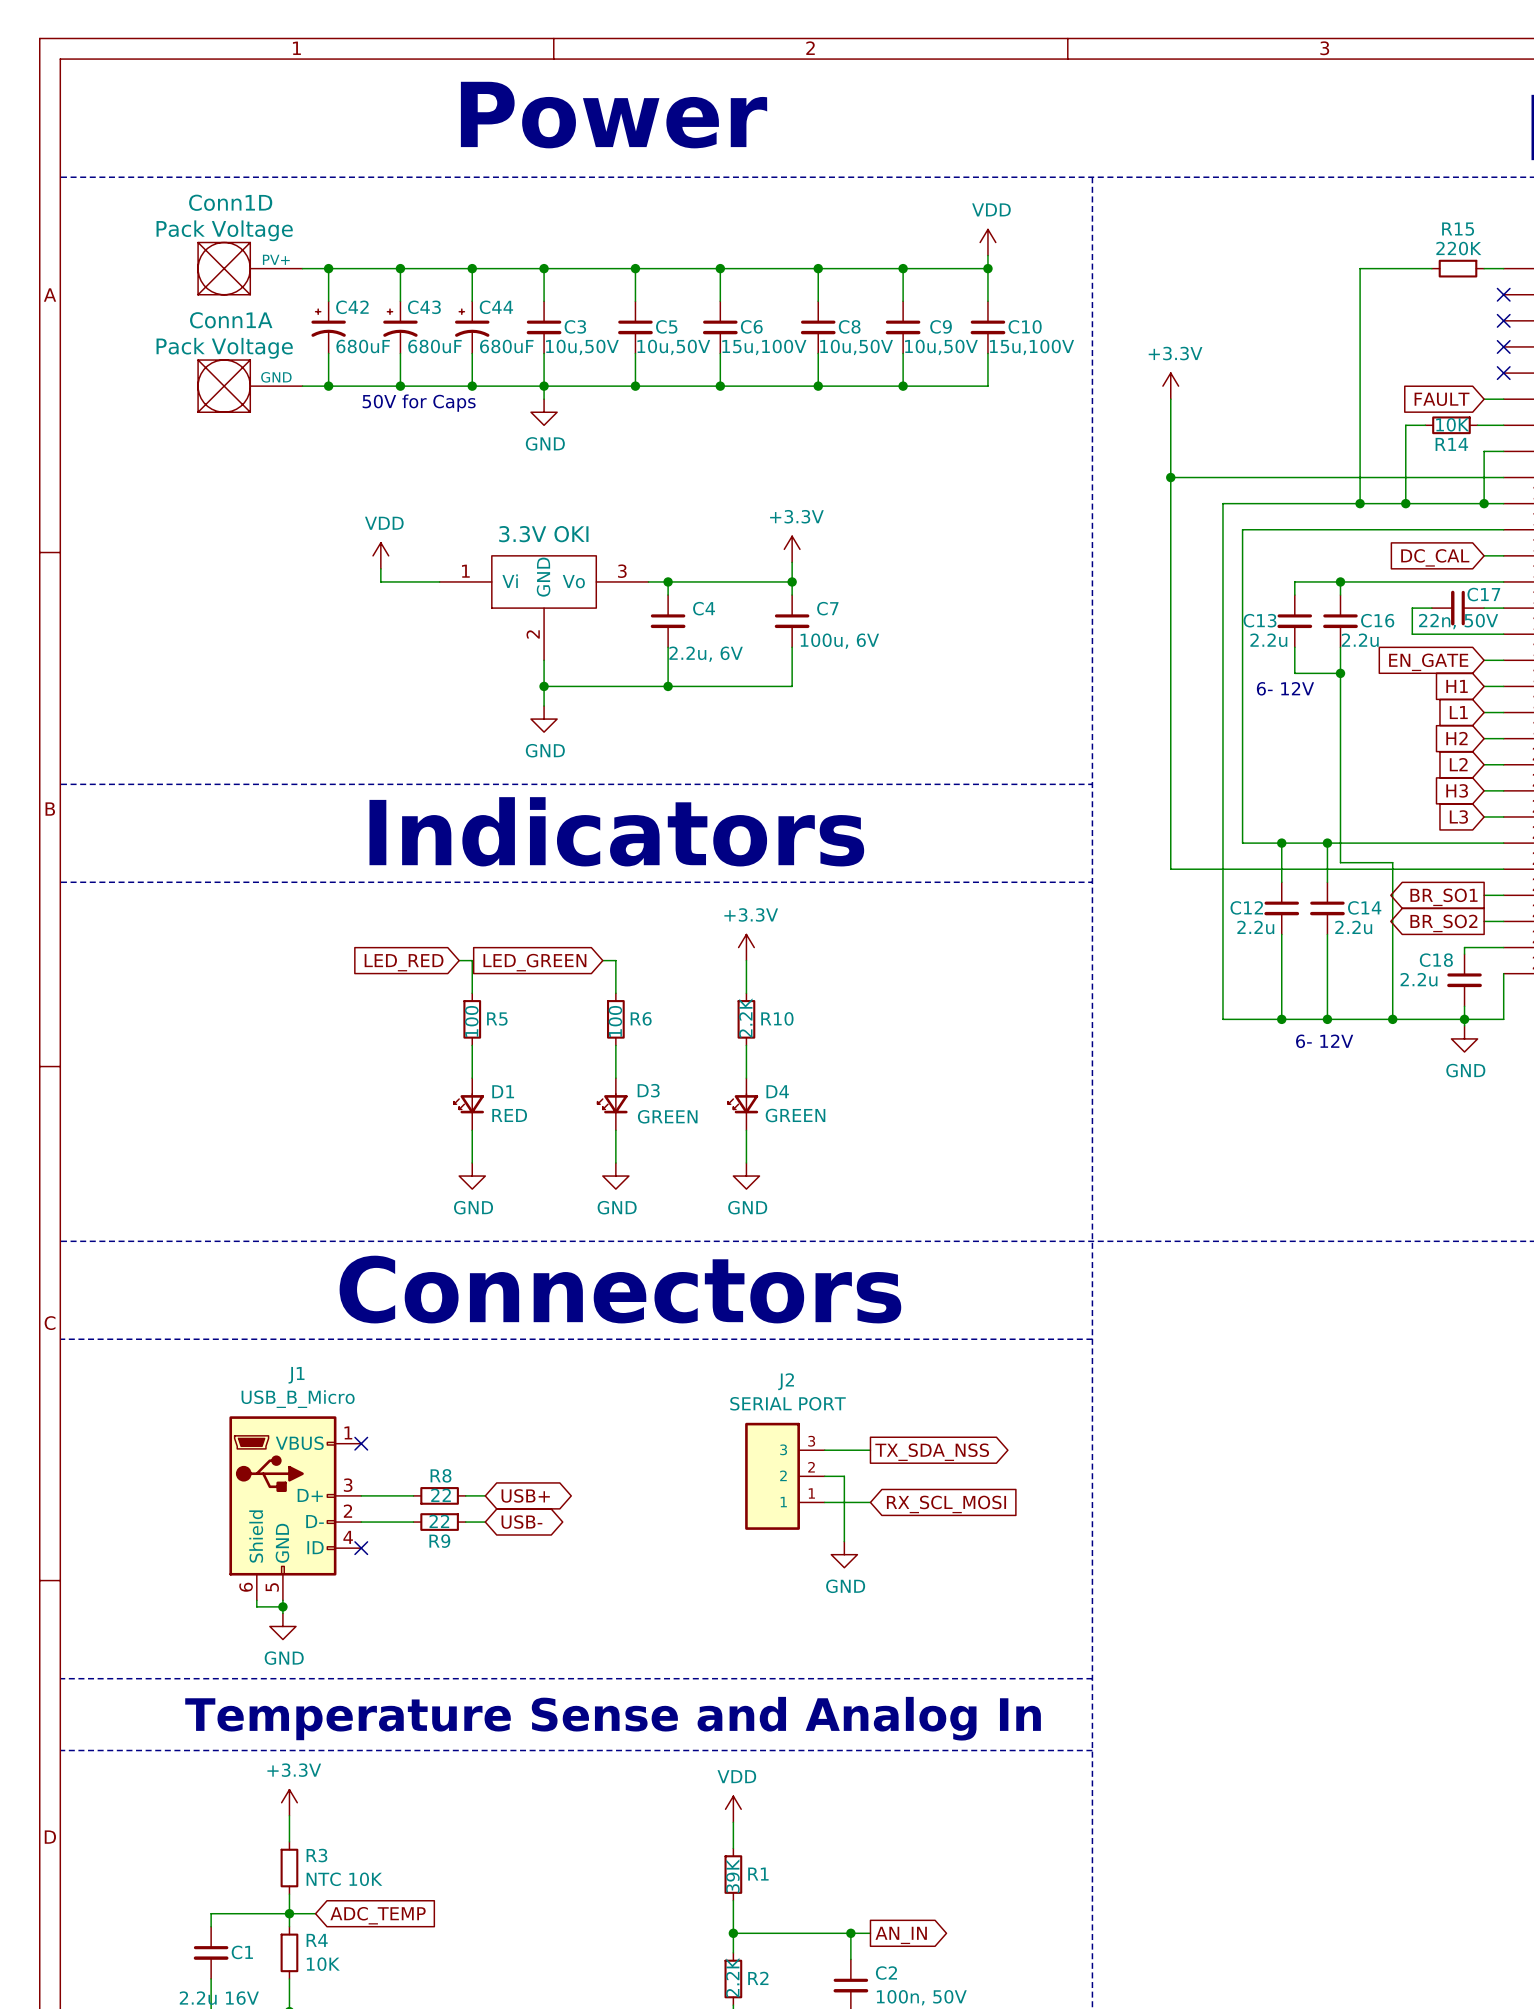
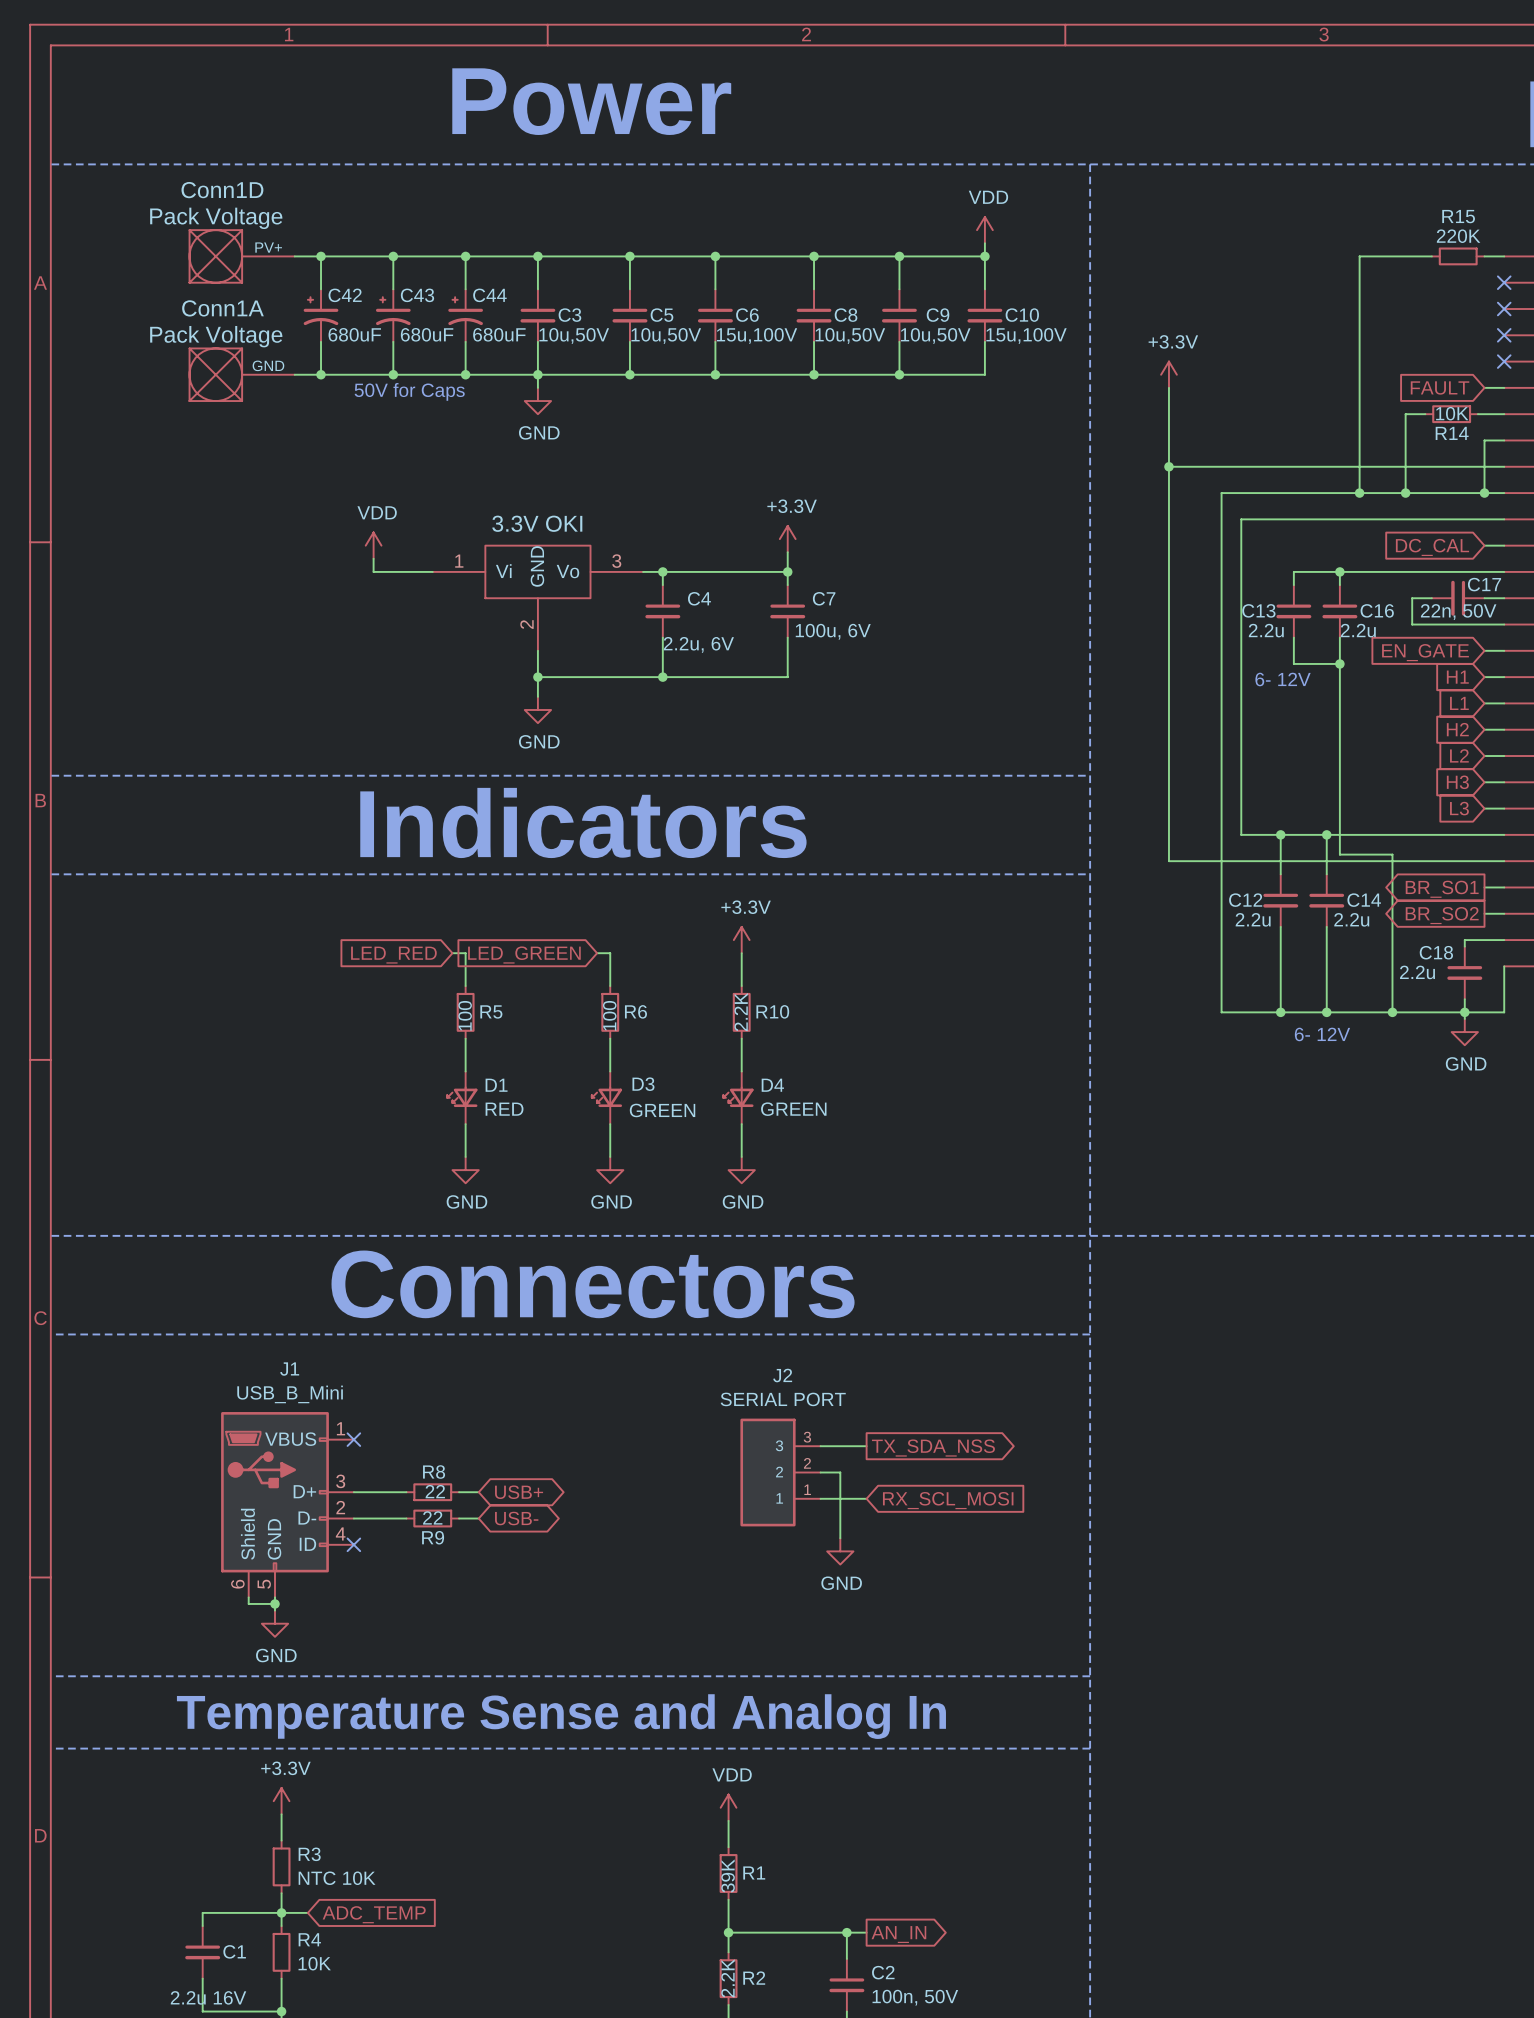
J1 value: USB_B_Micro (298, 1399) -> USB_B_Mini (290, 1394)

